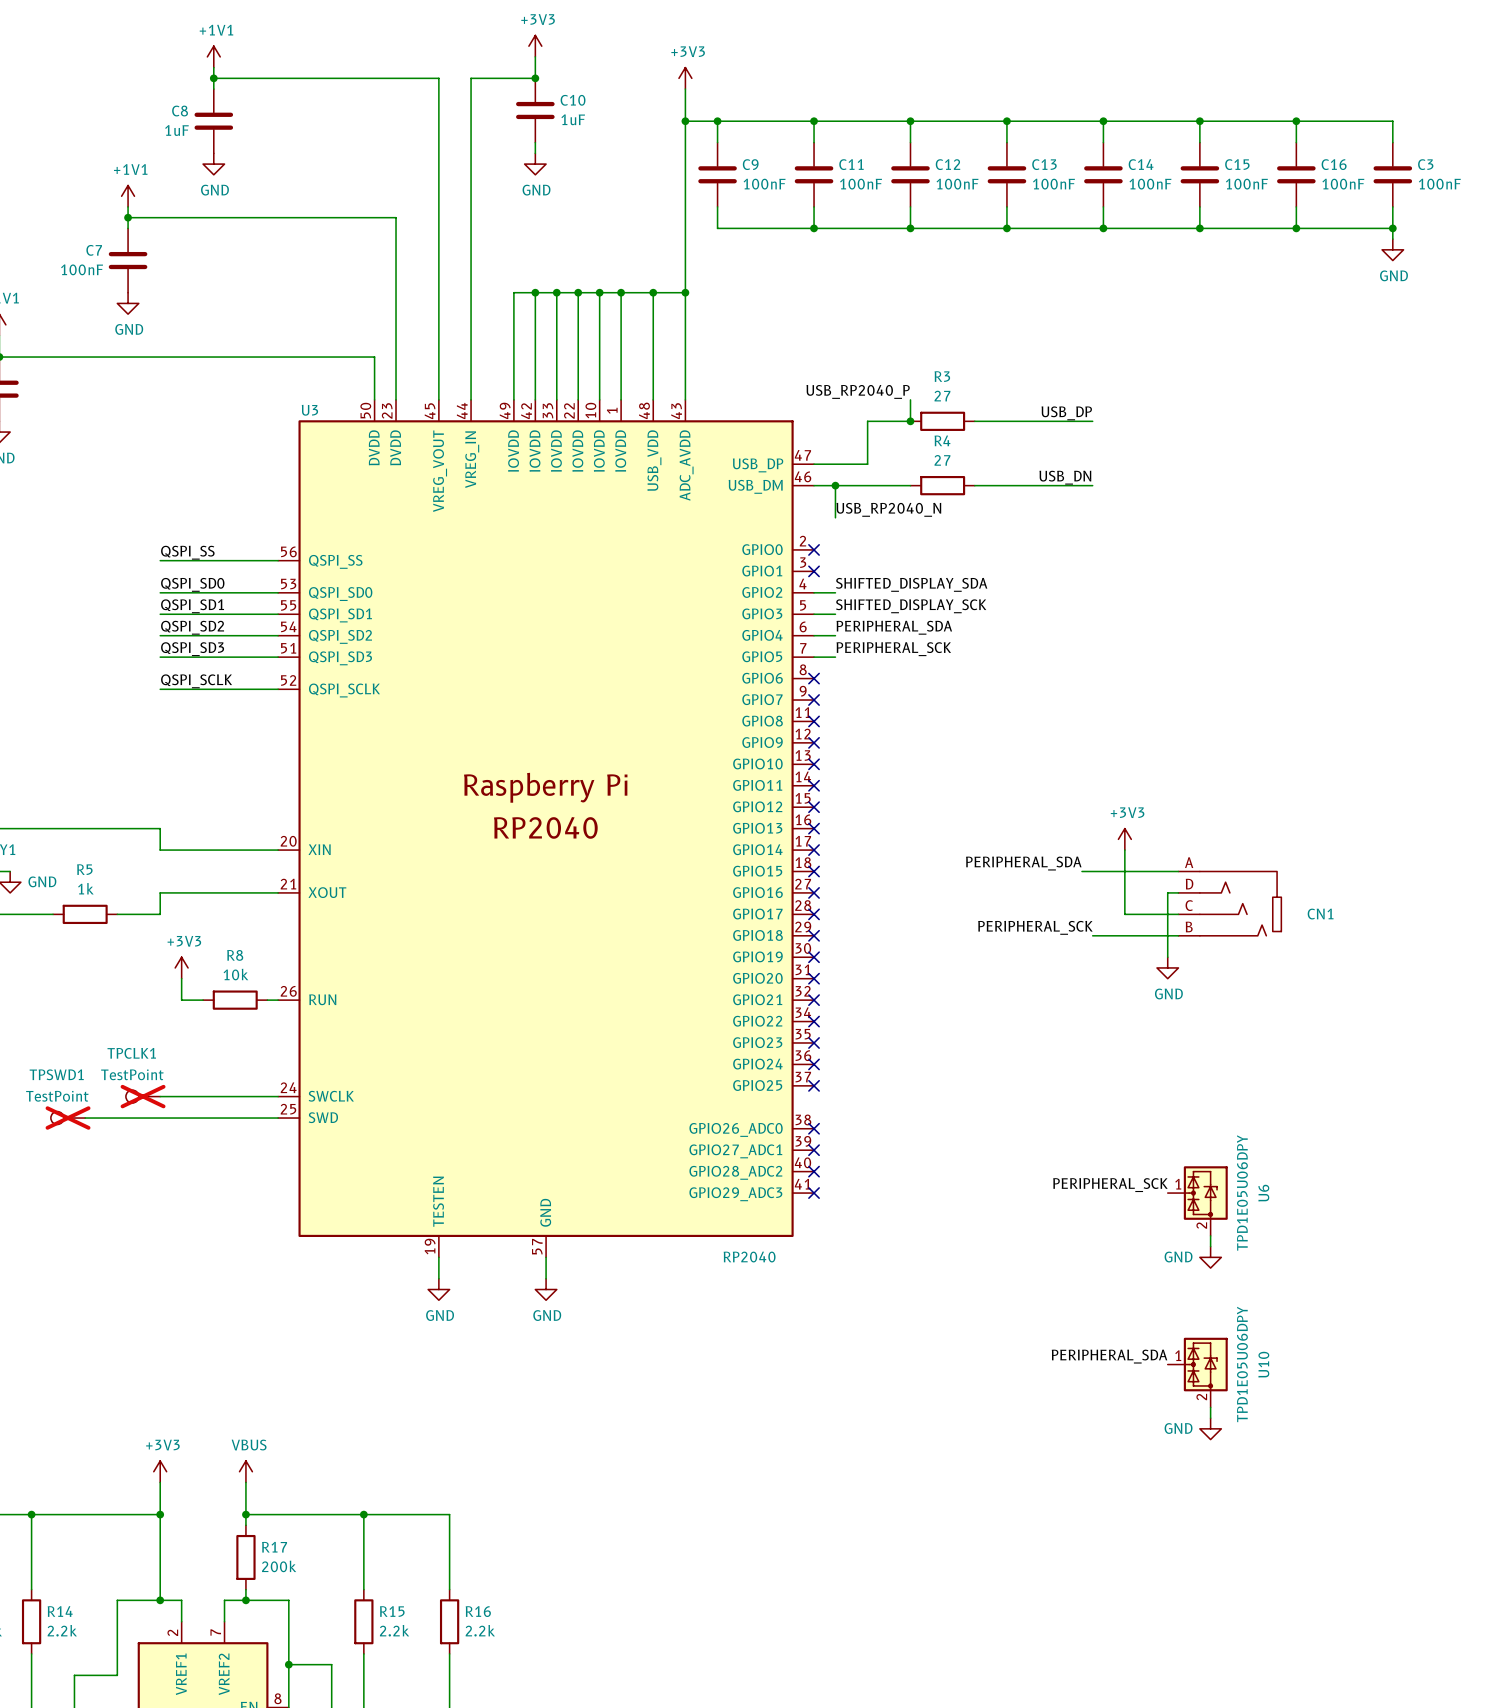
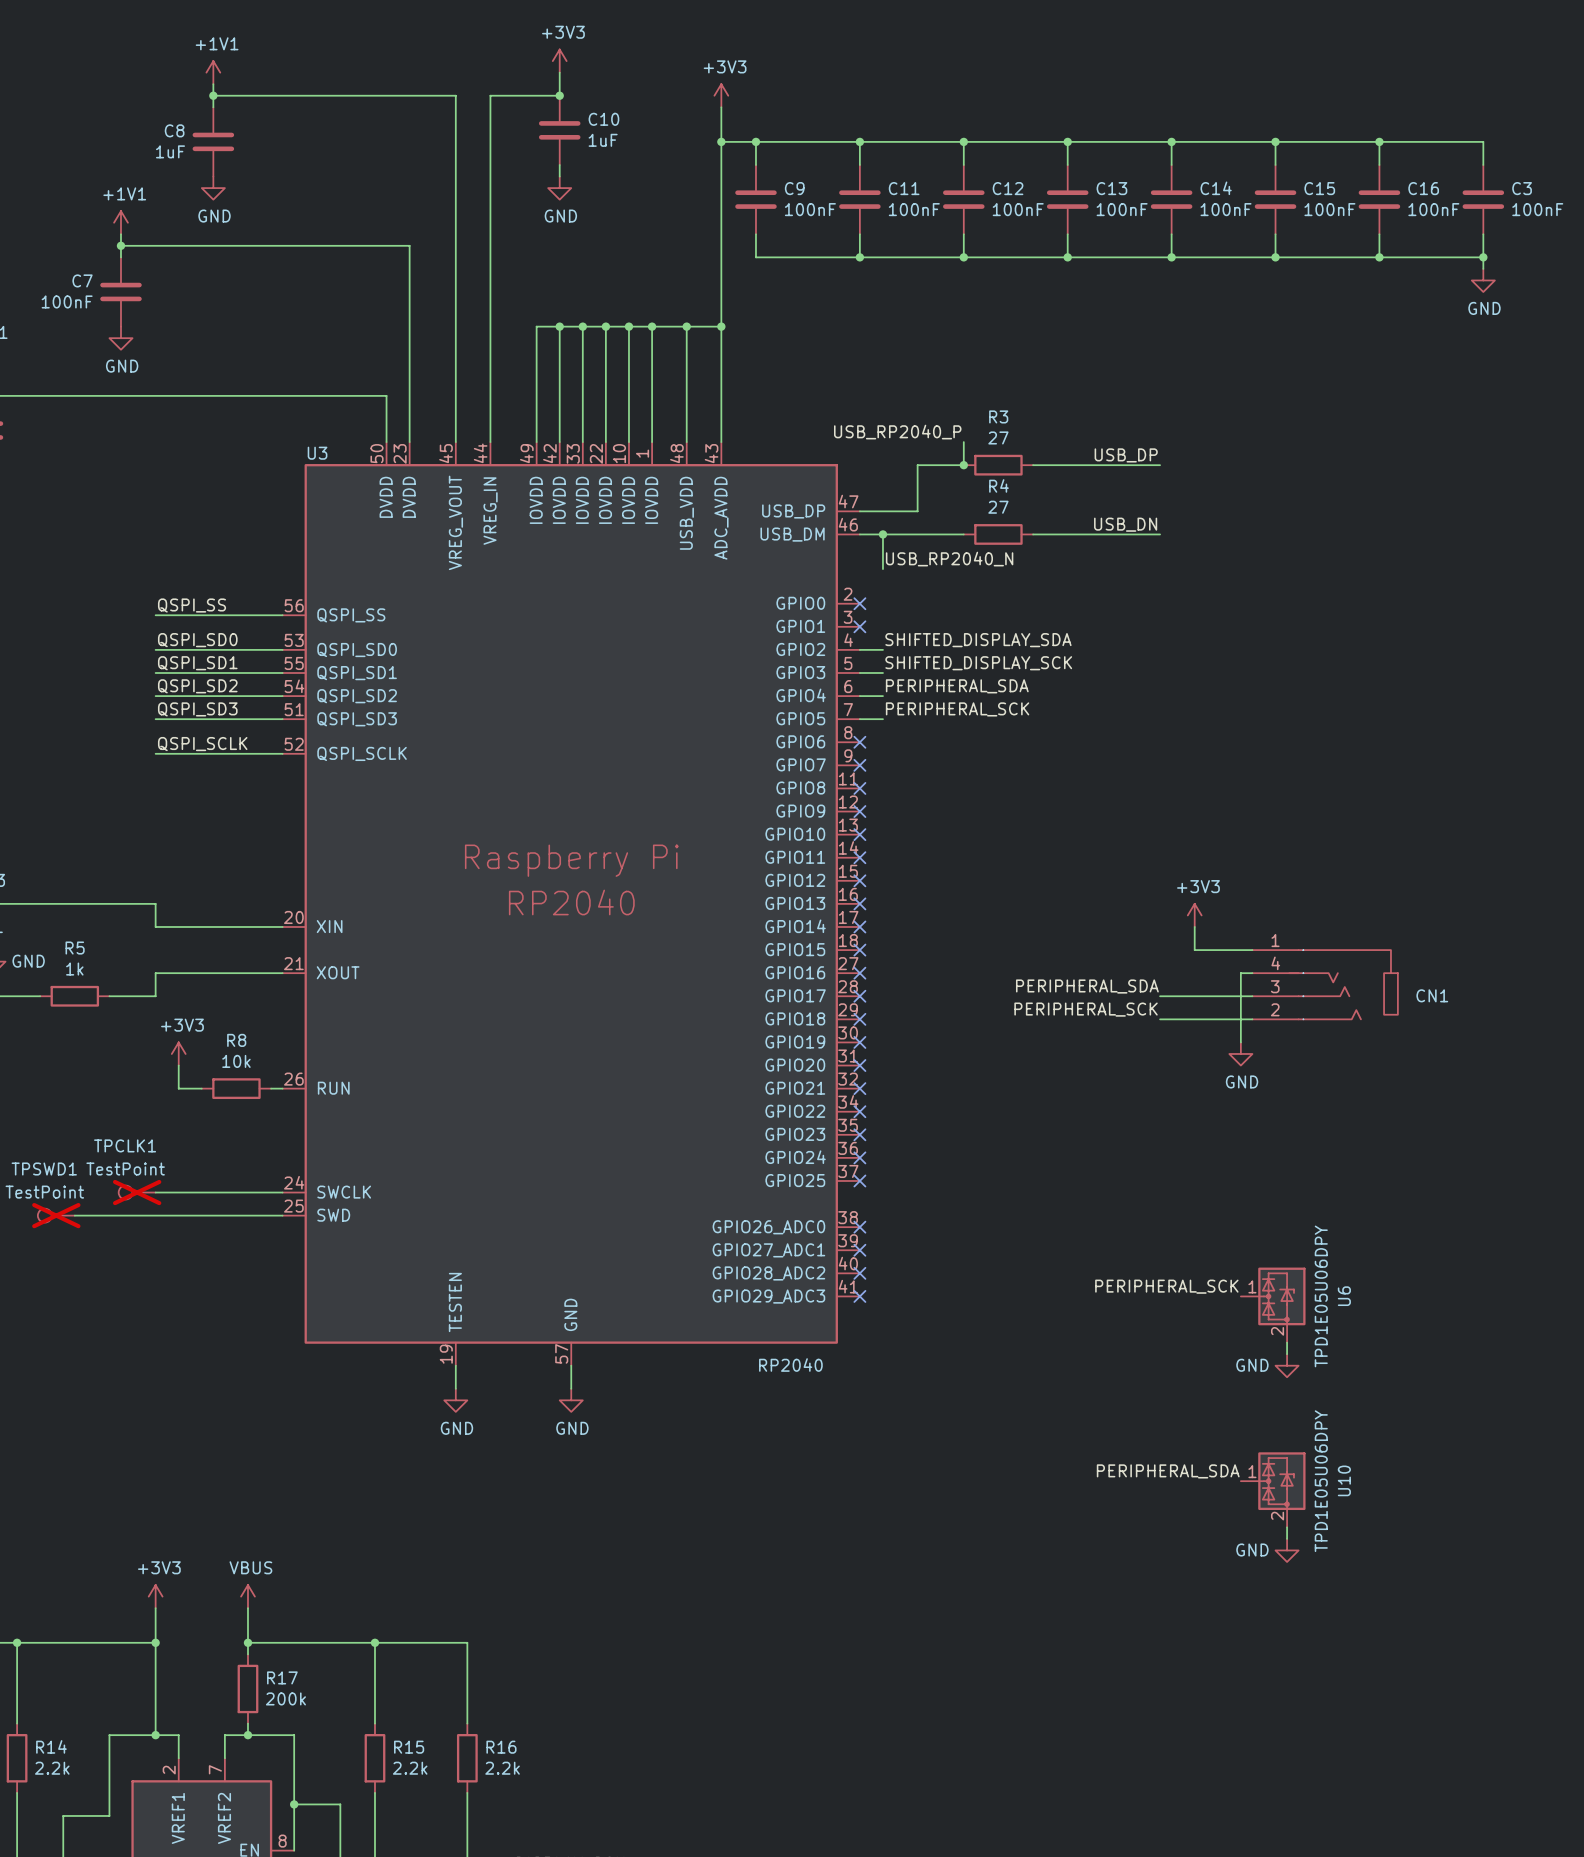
label position: PERIPHERAL_SDA (1023, 863) -> PERIPHERAL_SDA (1087, 986)
wire: (1081, 871) (1124, 871) (1124, 914) -> (1160, 996) (1194, 996)
CN1 symbol: [1178, 871, 1282, 936] -> [1252, 950, 1398, 1020]

